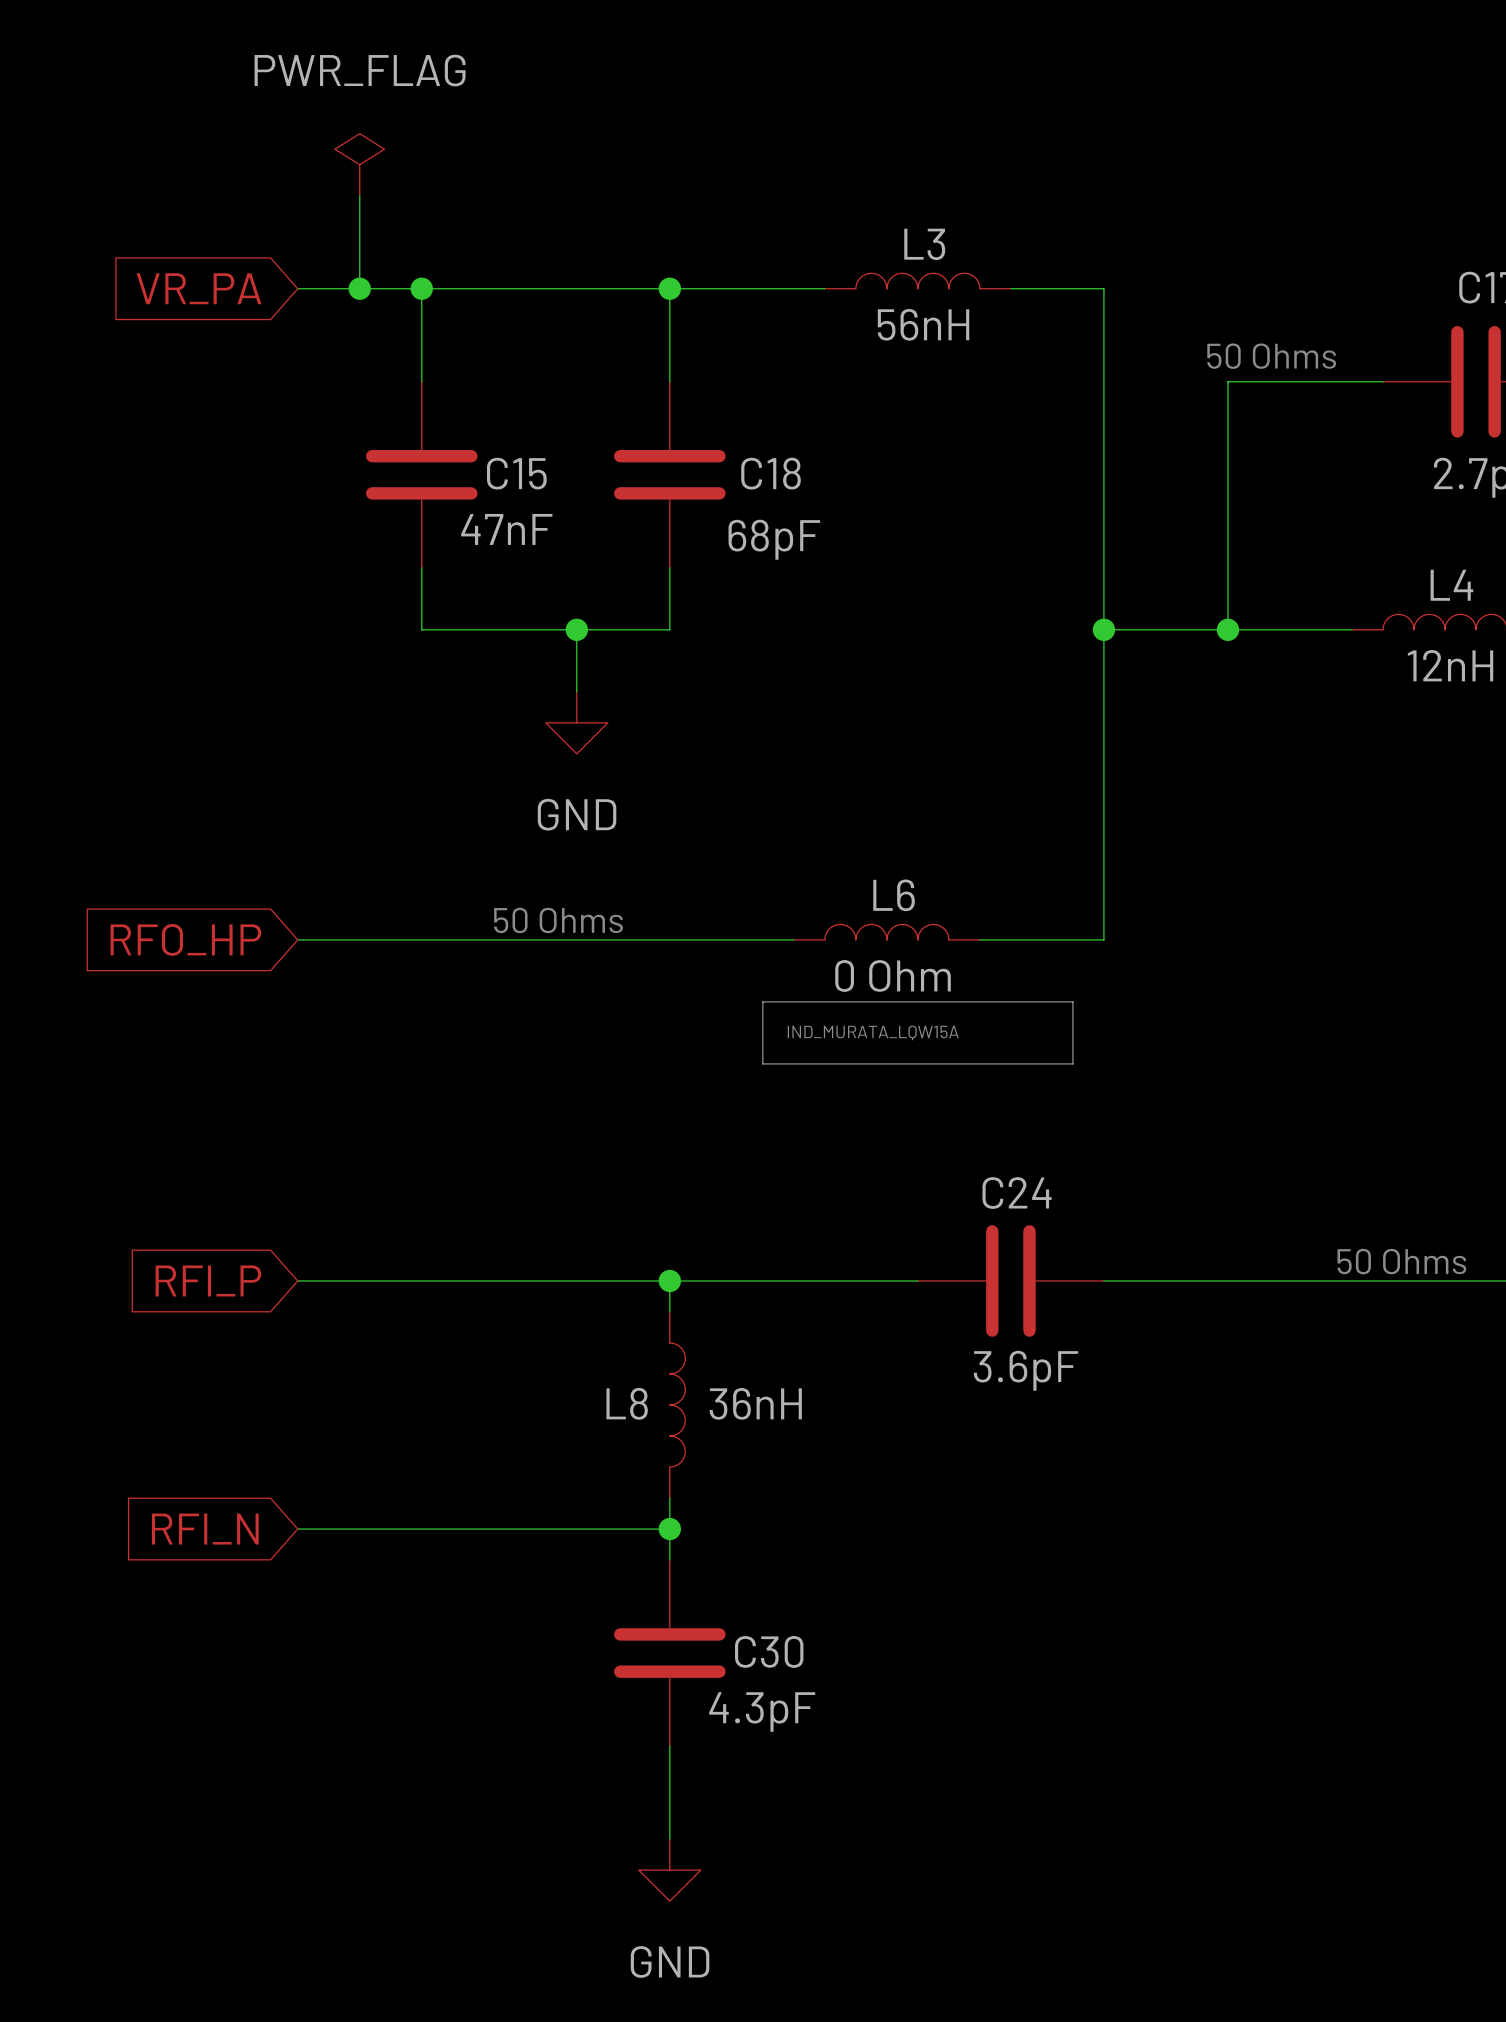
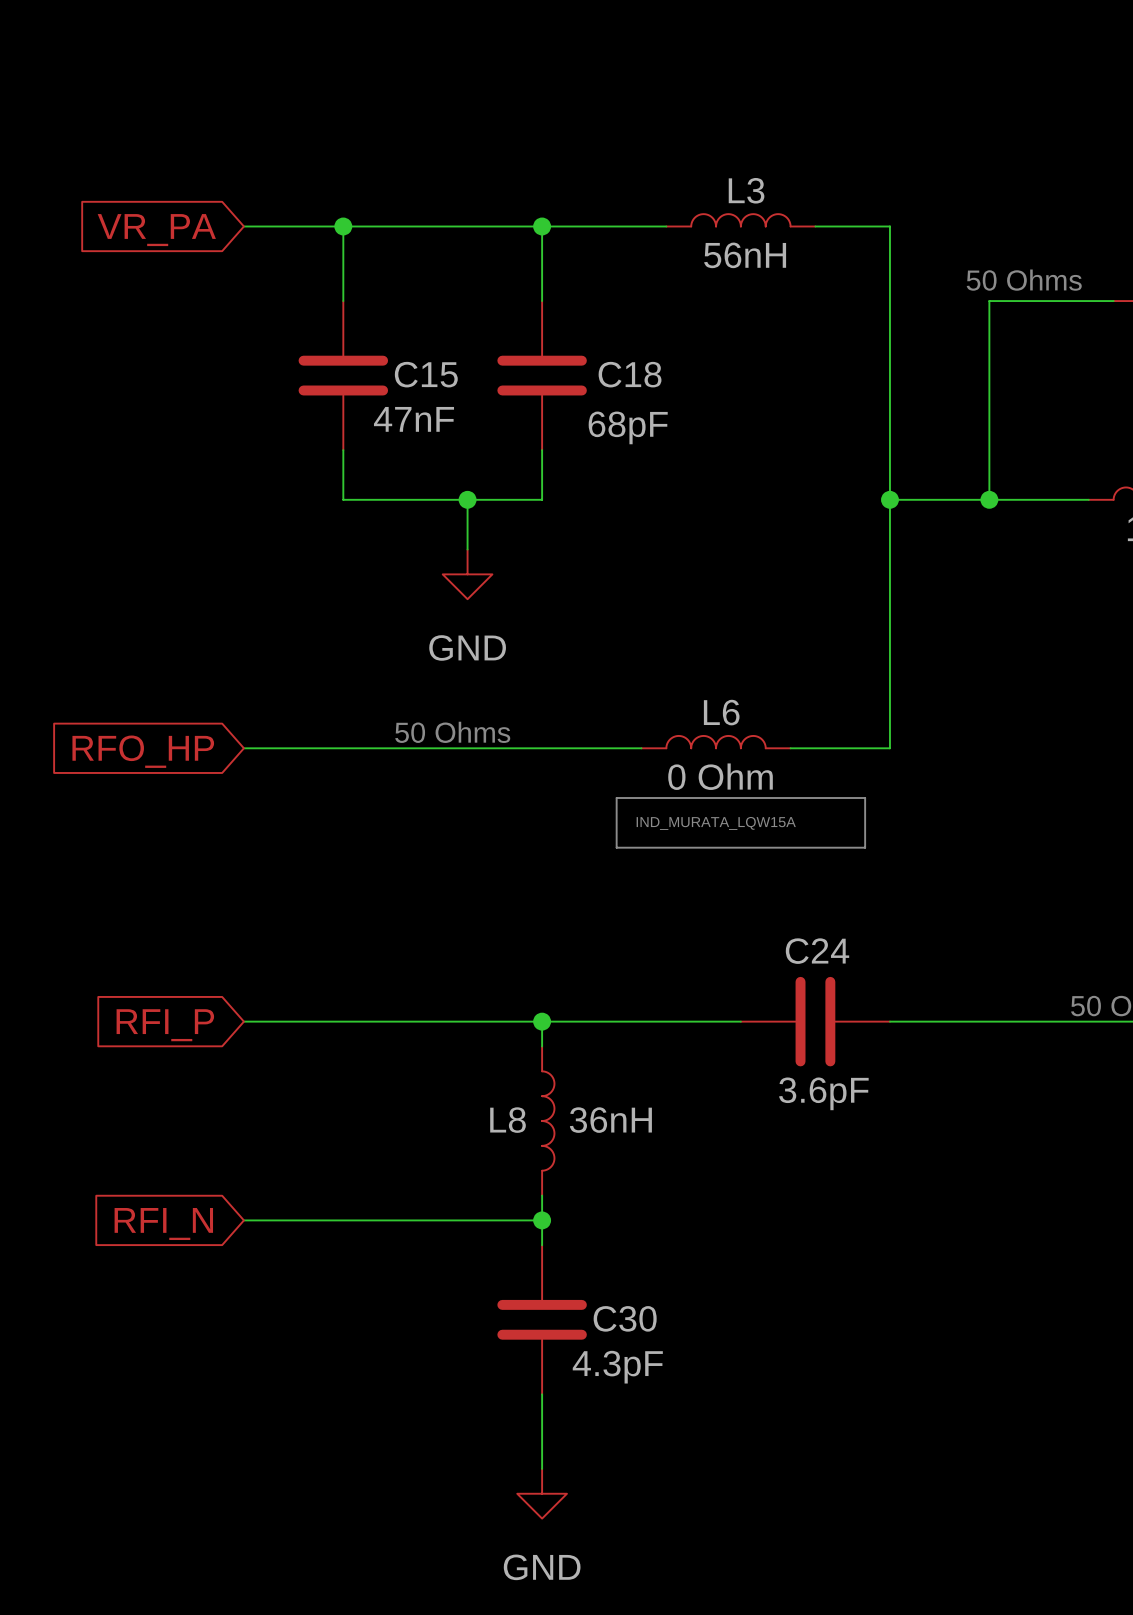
power symbol: PWR_FLAG (359, 164) -> none
wire: (359, 195) (359, 288) -> none
junction: (359, 288) -> none

